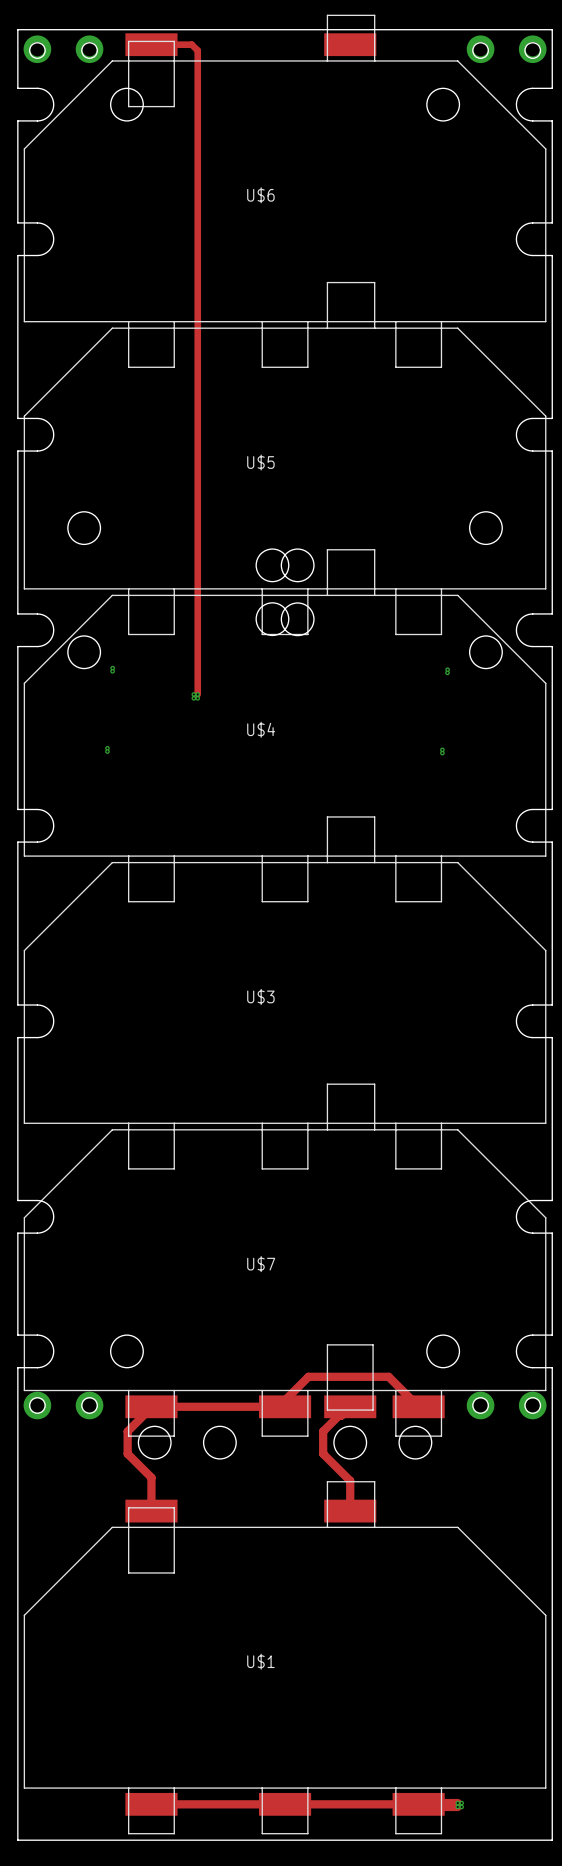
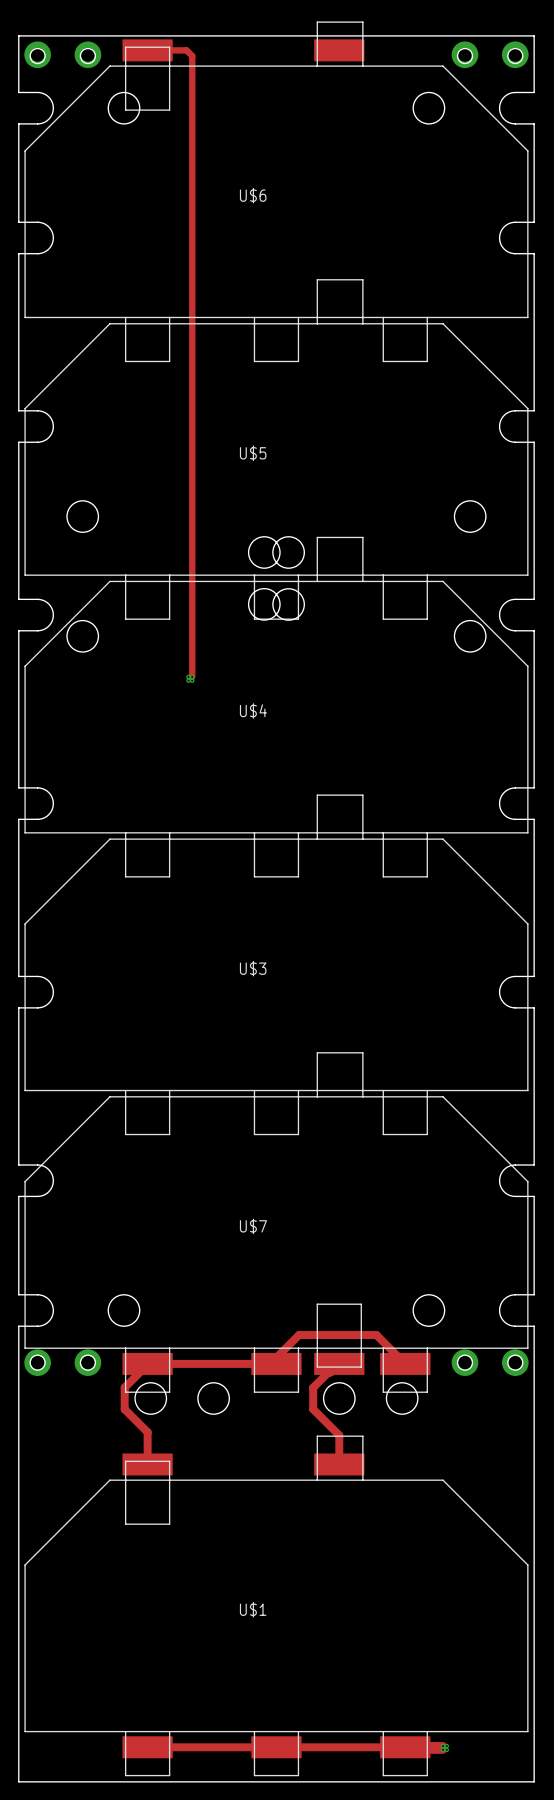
via: (112, 668) -> none
via: (447, 669) -> none
via: (112, 671) -> none
via: (447, 672) -> none
via: (107, 748) -> none
via: (442, 749) -> none
via: (107, 751) -> none
via: (442, 753) -> none

